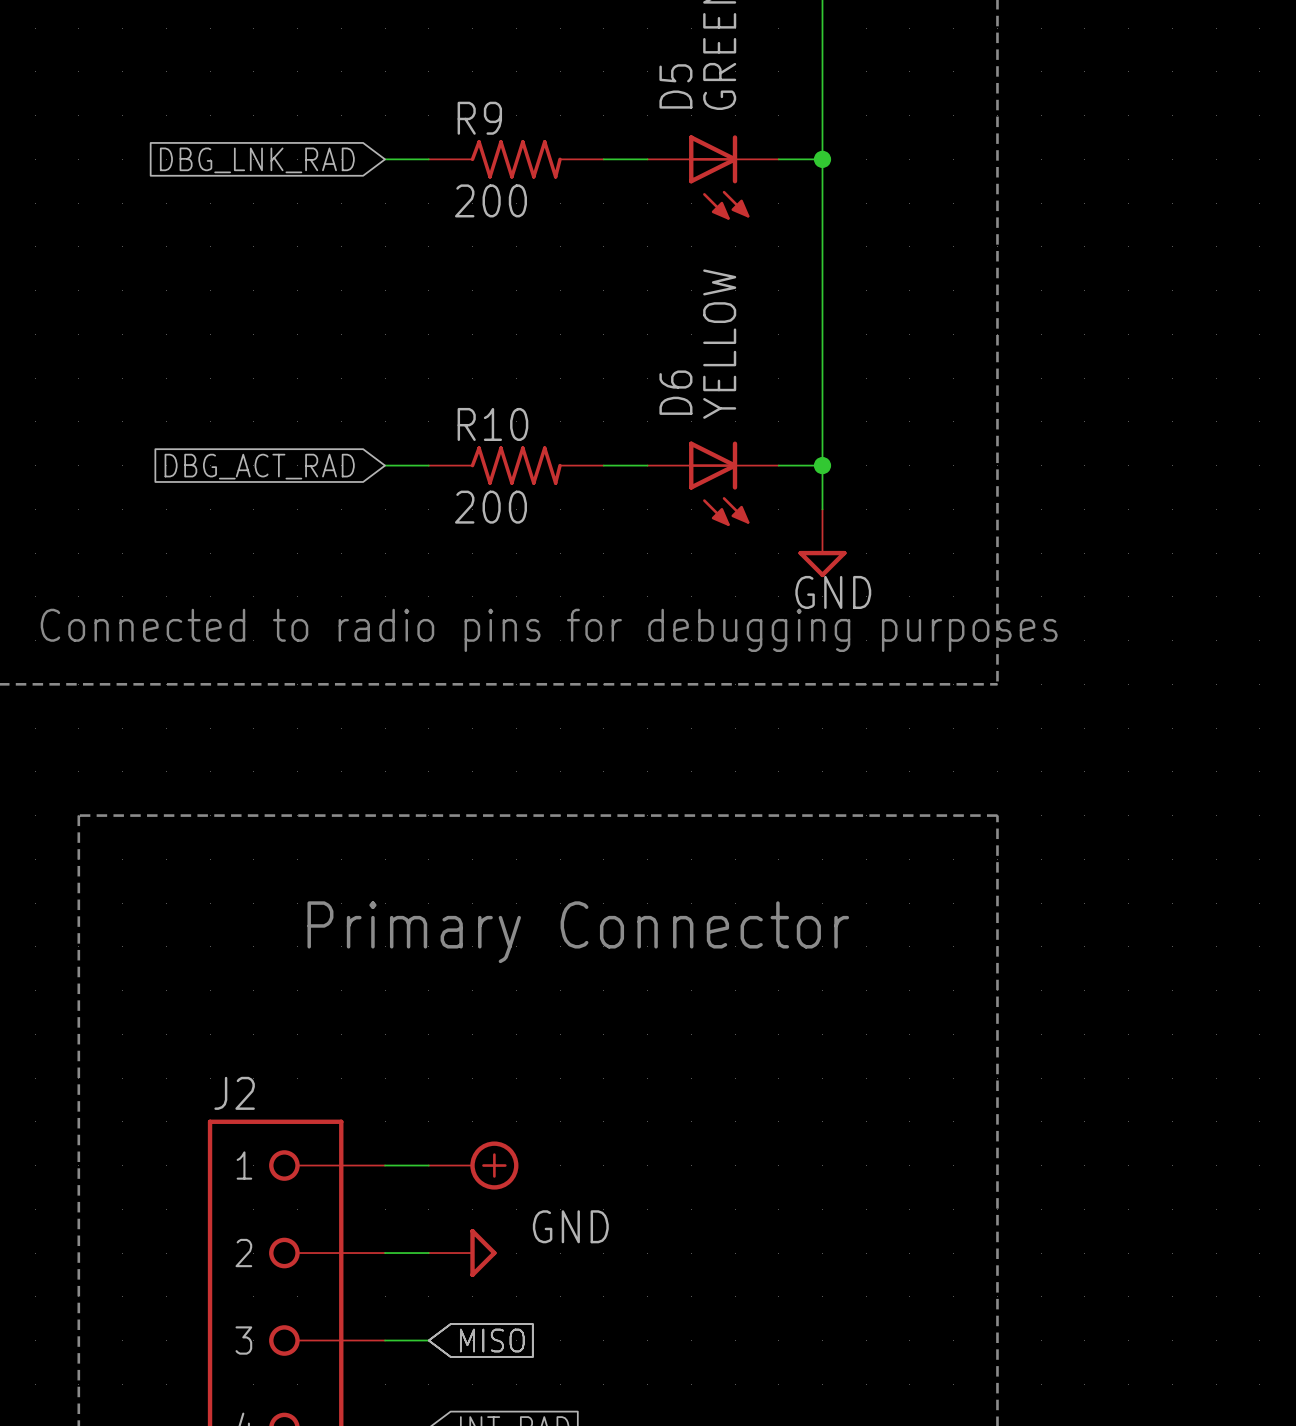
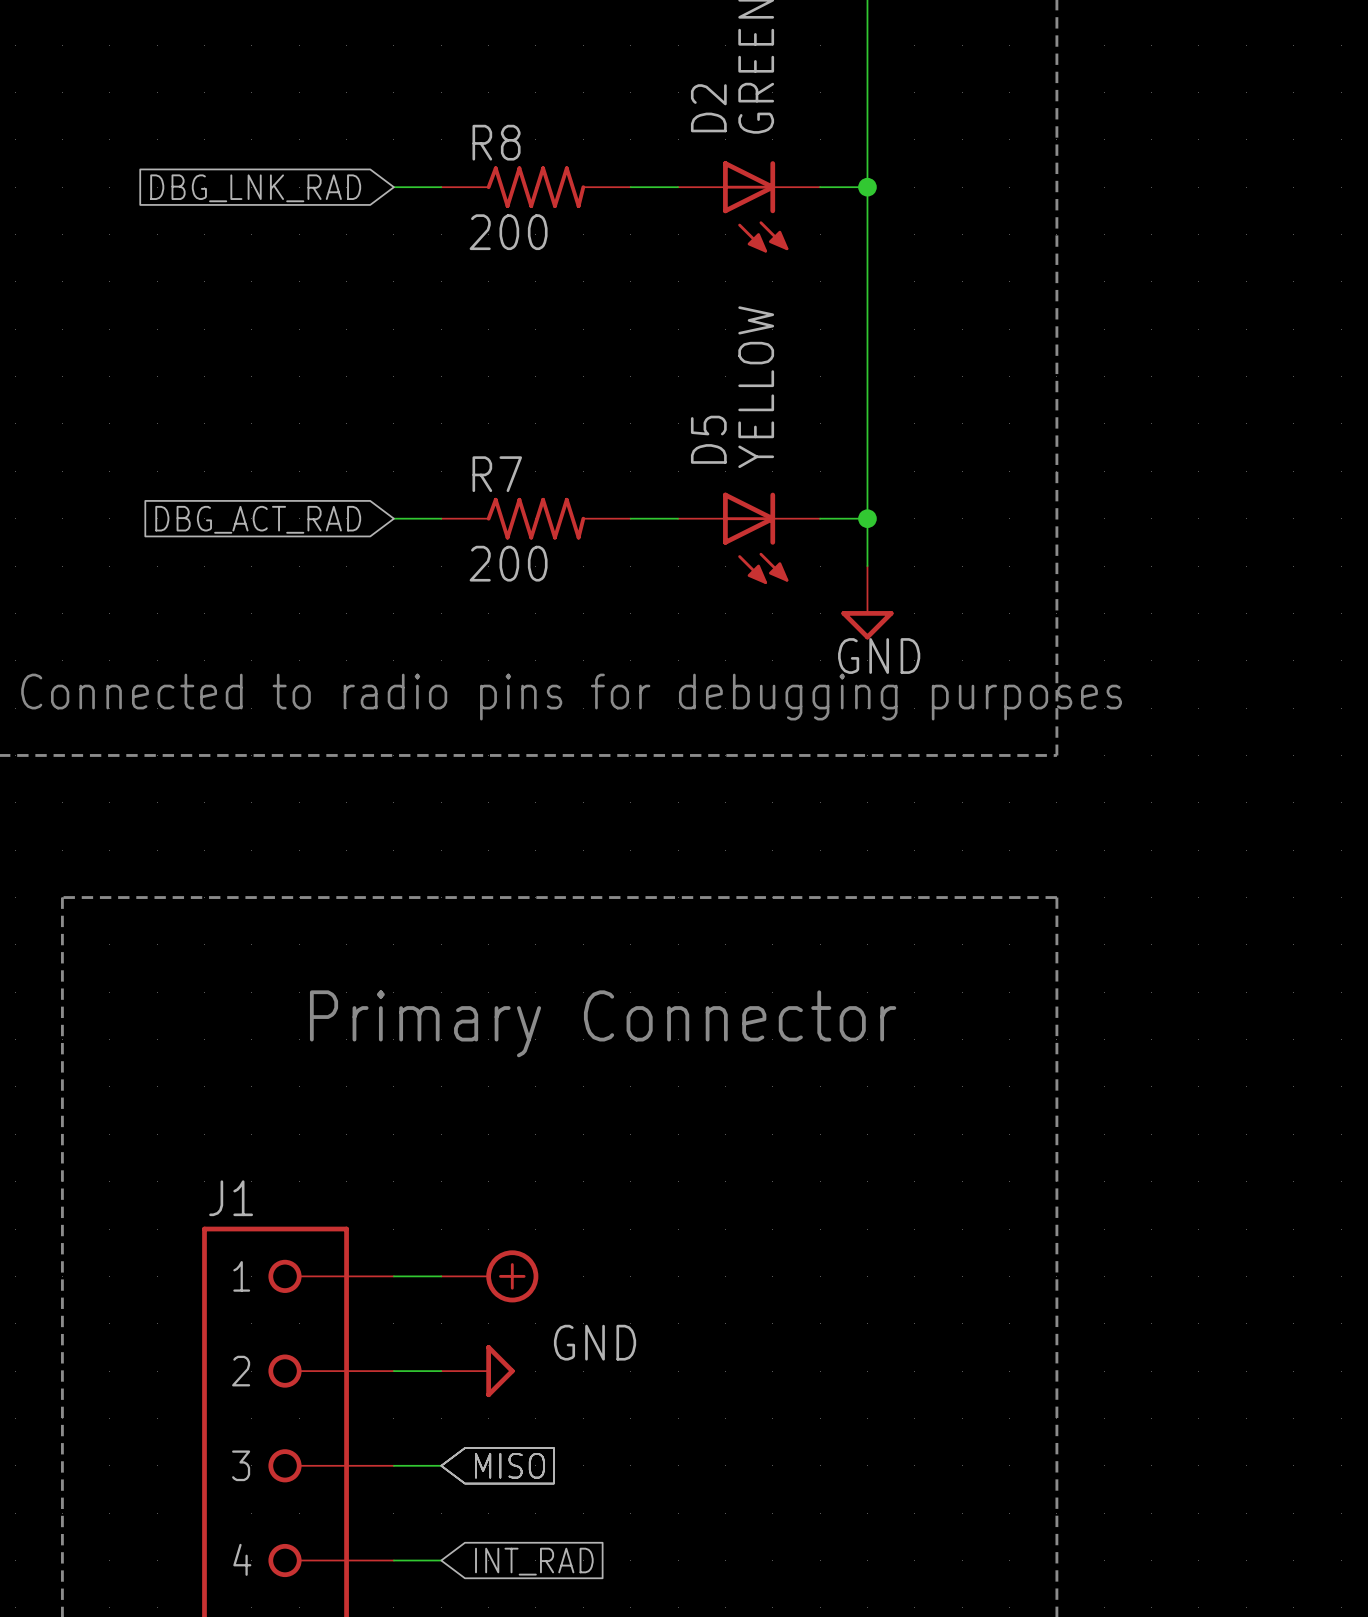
D5 name: D5 (675, 86) -> D2 (708, 108)
R9 name: R9 (479, 118) -> R8 (496, 142)
D6 name: D6 (675, 392) -> D5 (708, 439)
R10 name: R10 (492, 424) -> R7 (497, 474)
J2 name: J2 (234, 1093) -> J1 (231, 1198)

